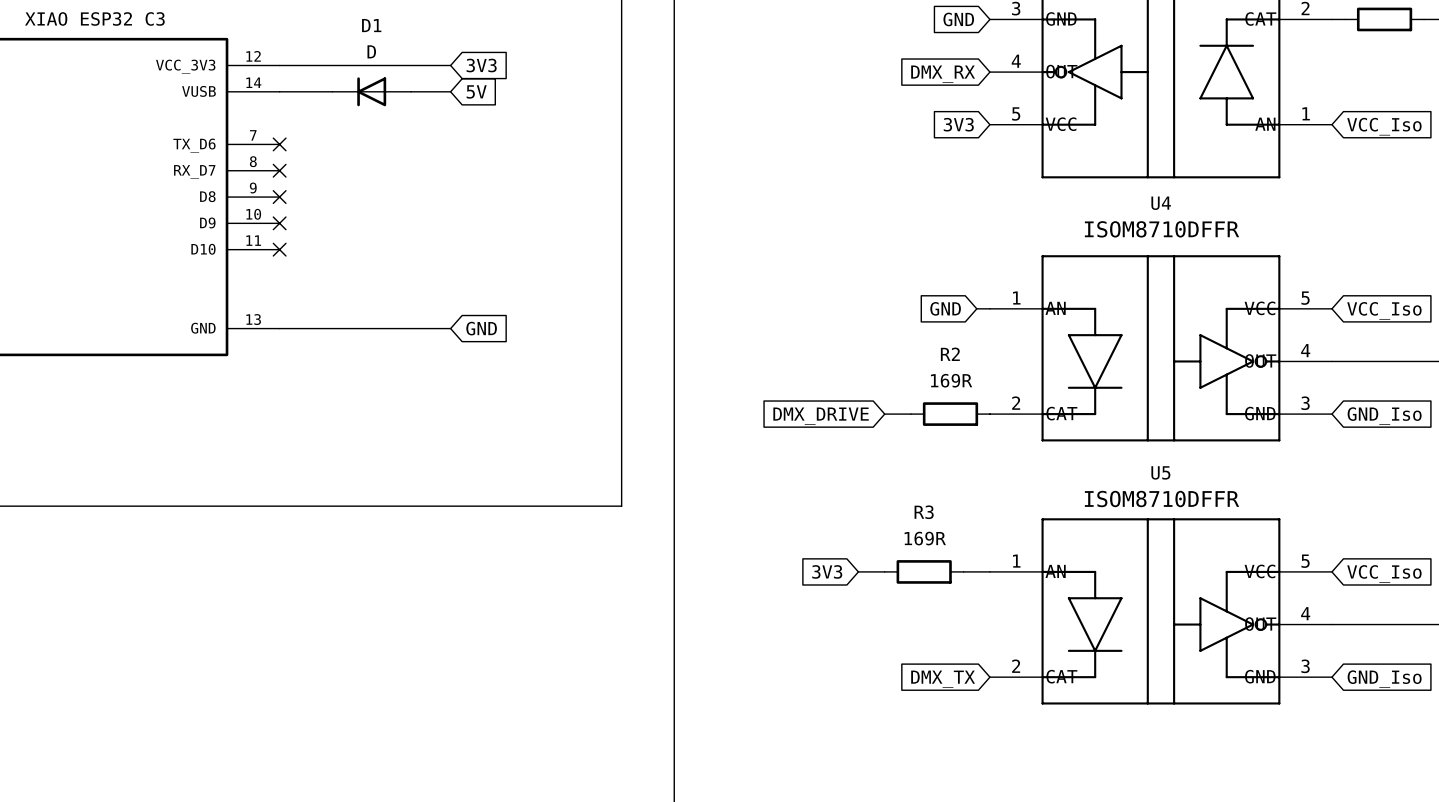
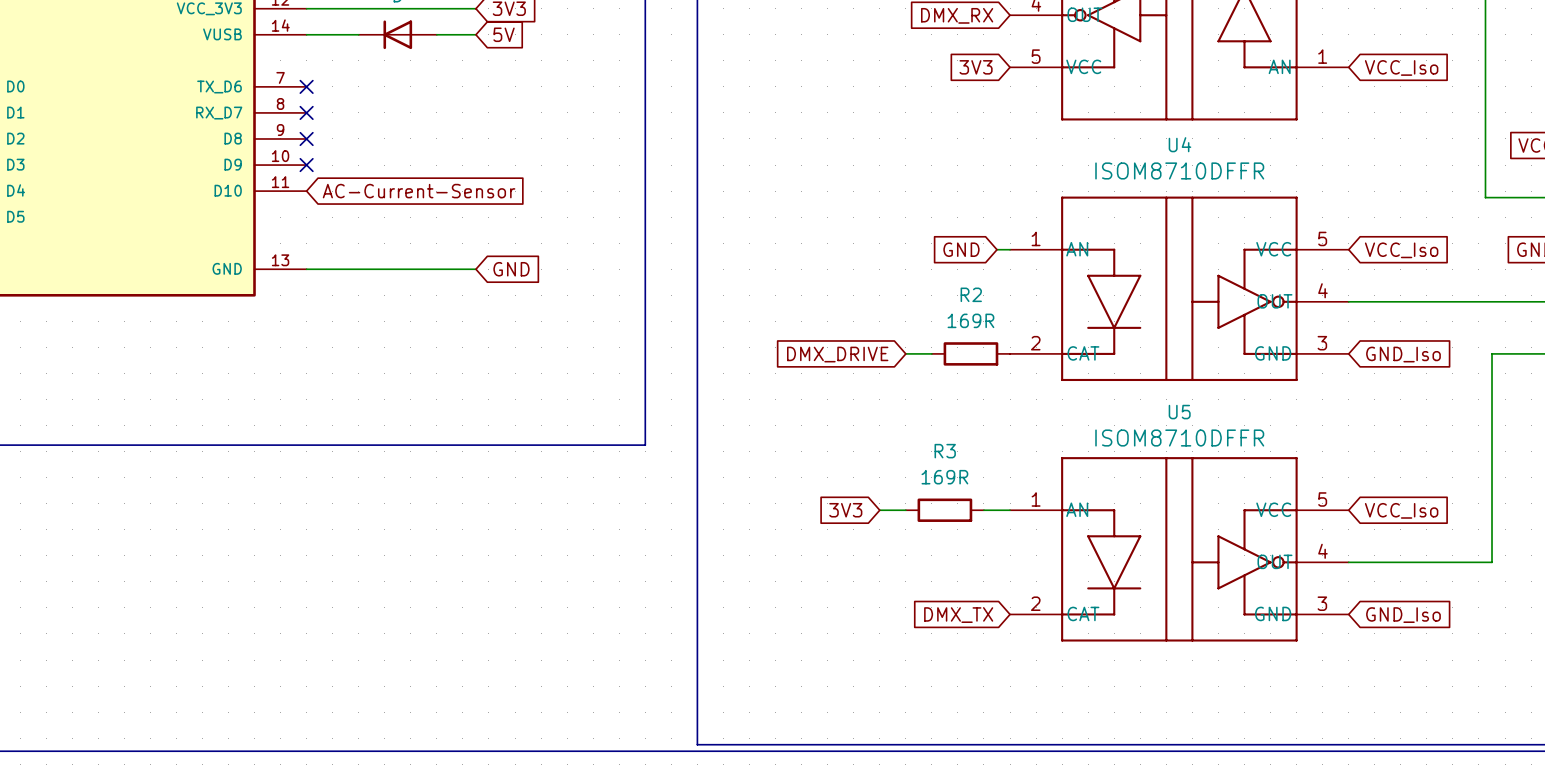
no-connect mark: (279, 249) -> none
global label: none -> AC-Current-Sensor (419, 191)

